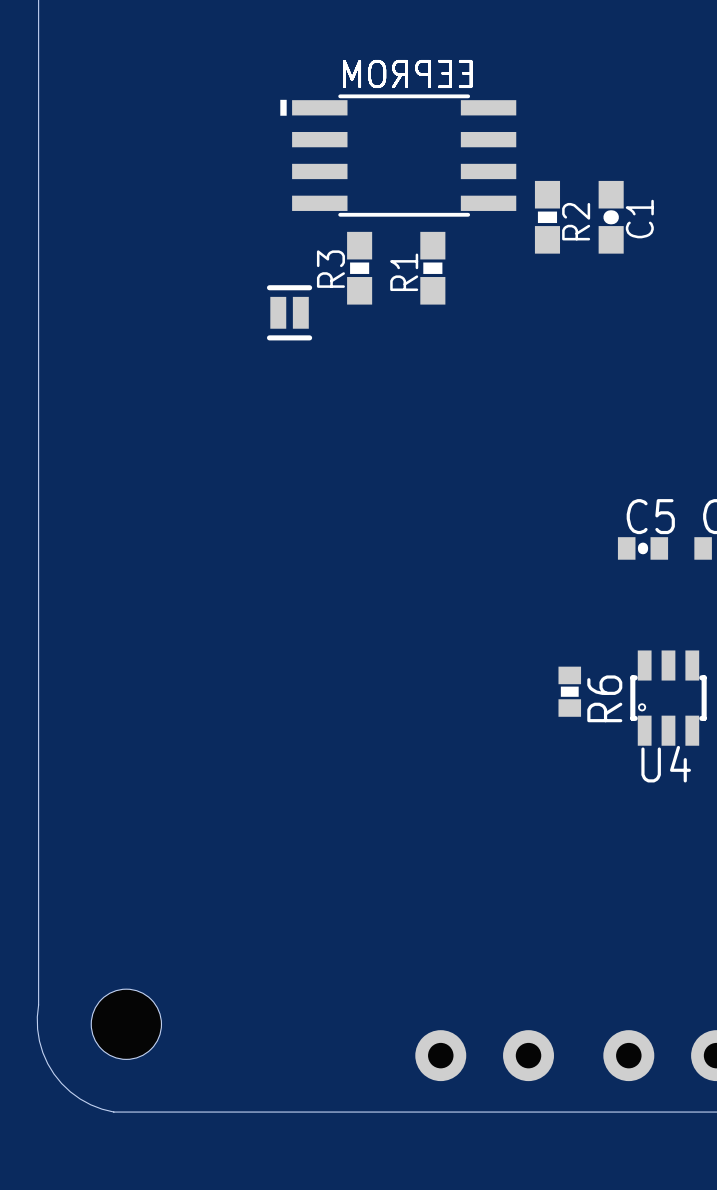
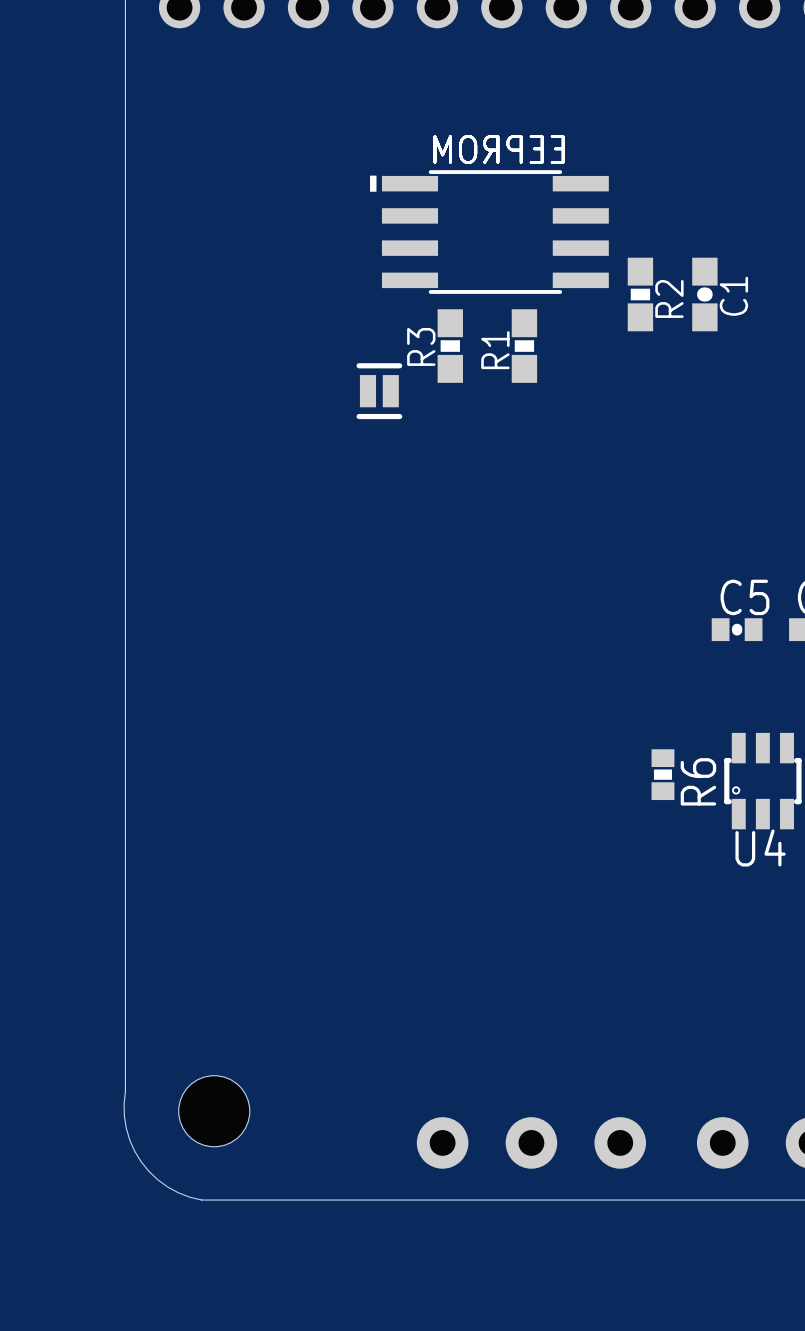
part: none -> (531, 1142)
part: (484, 1055) -> none

